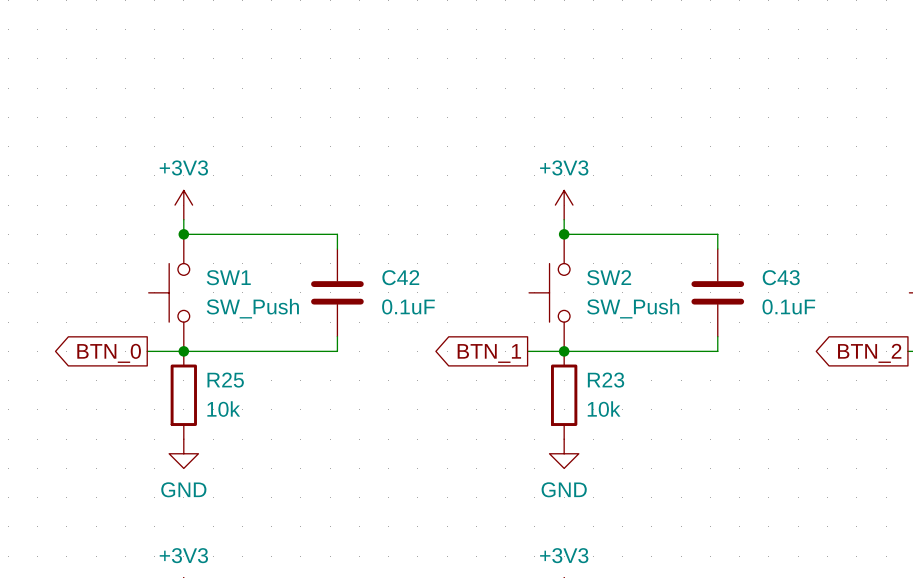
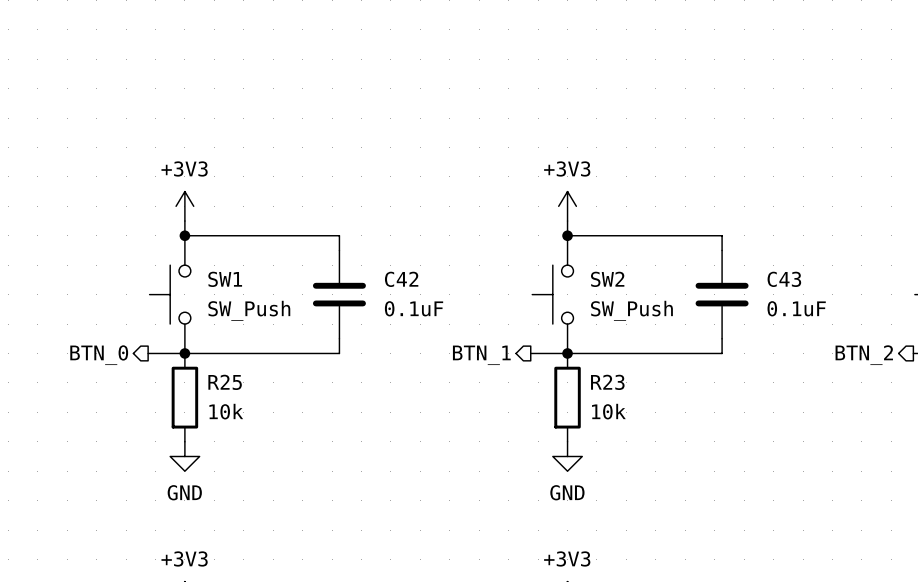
hierarchical label: none -> BTN_0 (99, 355)
hierarchical label: none -> BTN_1 (481, 355)
hierarchical label: none -> BTN_2 (864, 355)
global label: BTN_0 (109, 353) -> none
global label: BTN_1 (489, 353) -> none
global label: BTN_2 (869, 353) -> none

